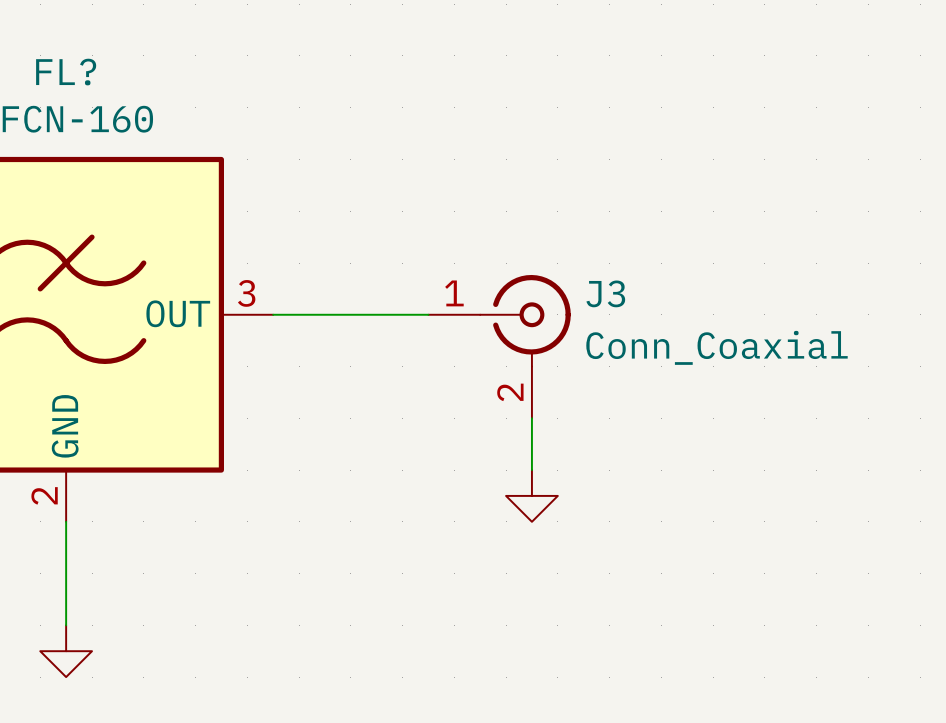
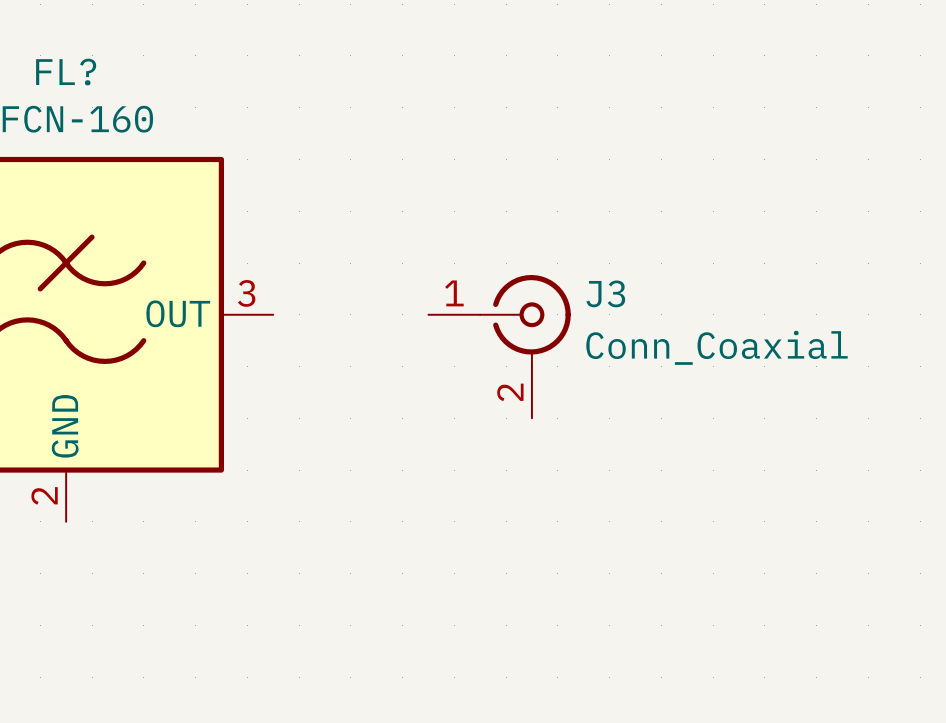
wire: (273, 314) (428, 314) -> none
wire: (531, 418) (531, 470) -> none
power symbol: (531, 495) -> none
wire: (66, 521) (66, 625) -> none
power symbol: (66, 651) -> none

